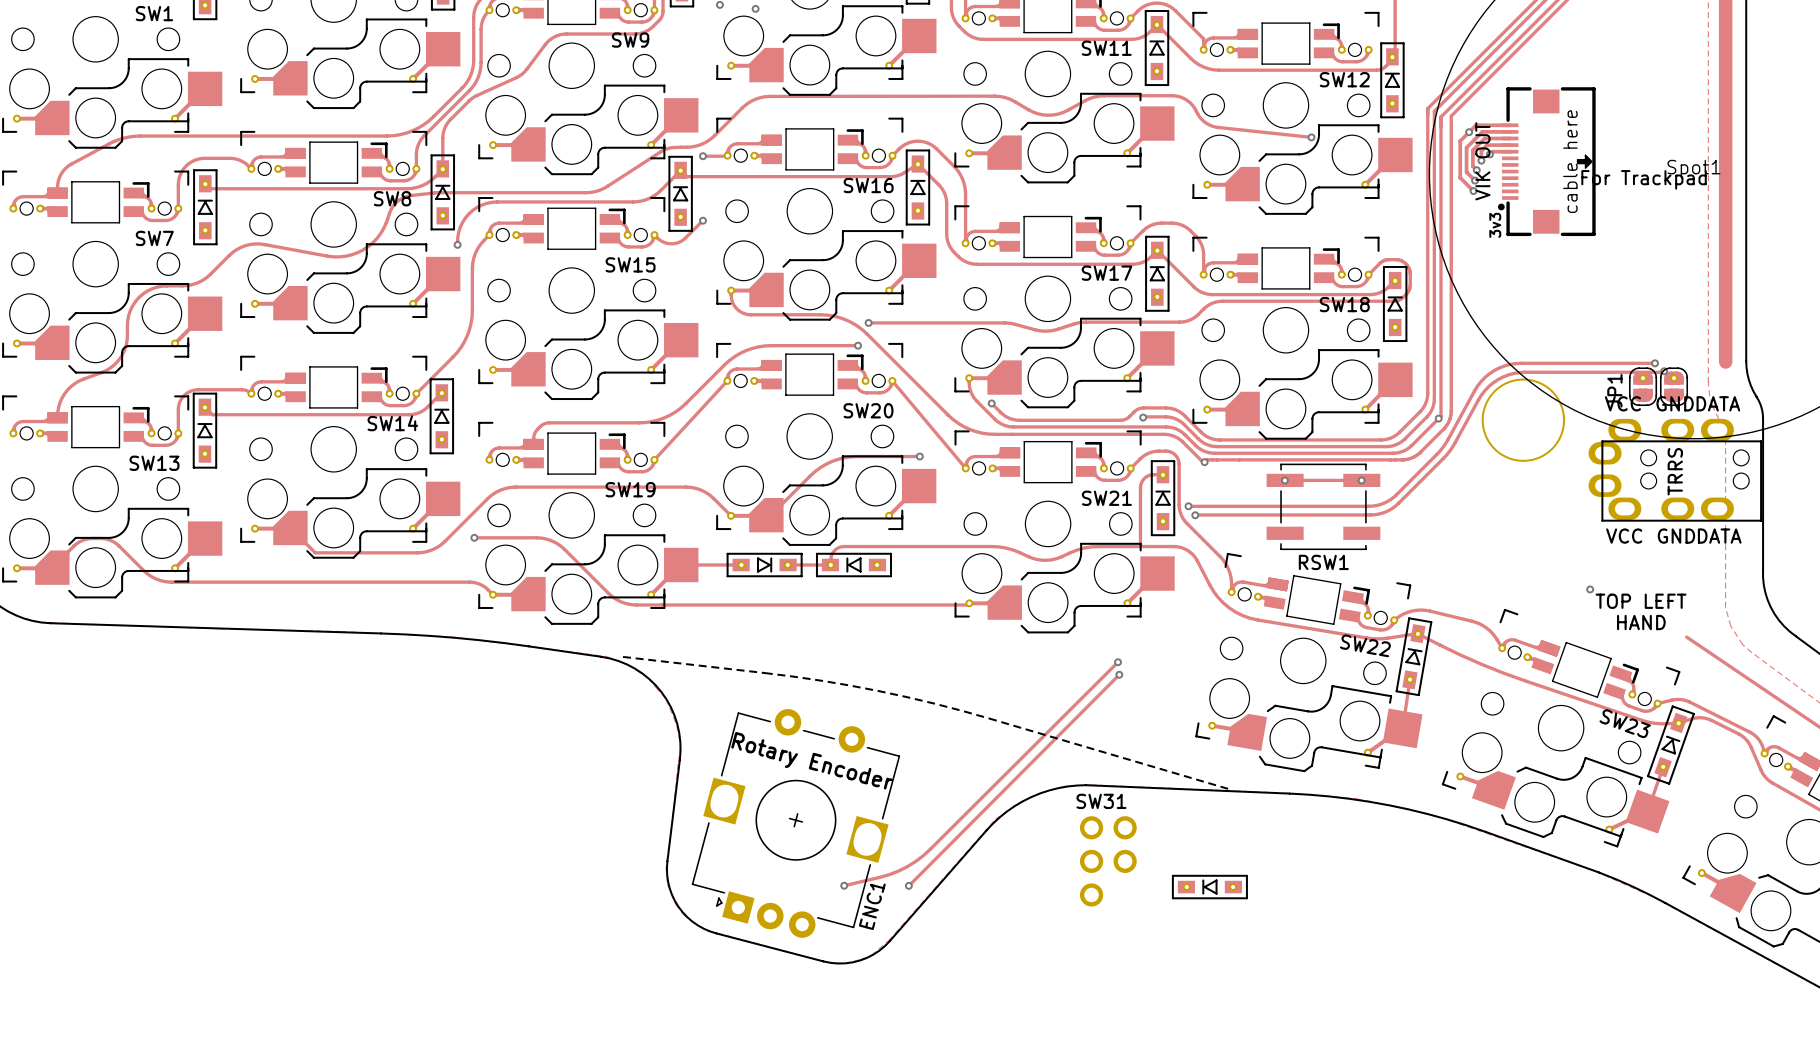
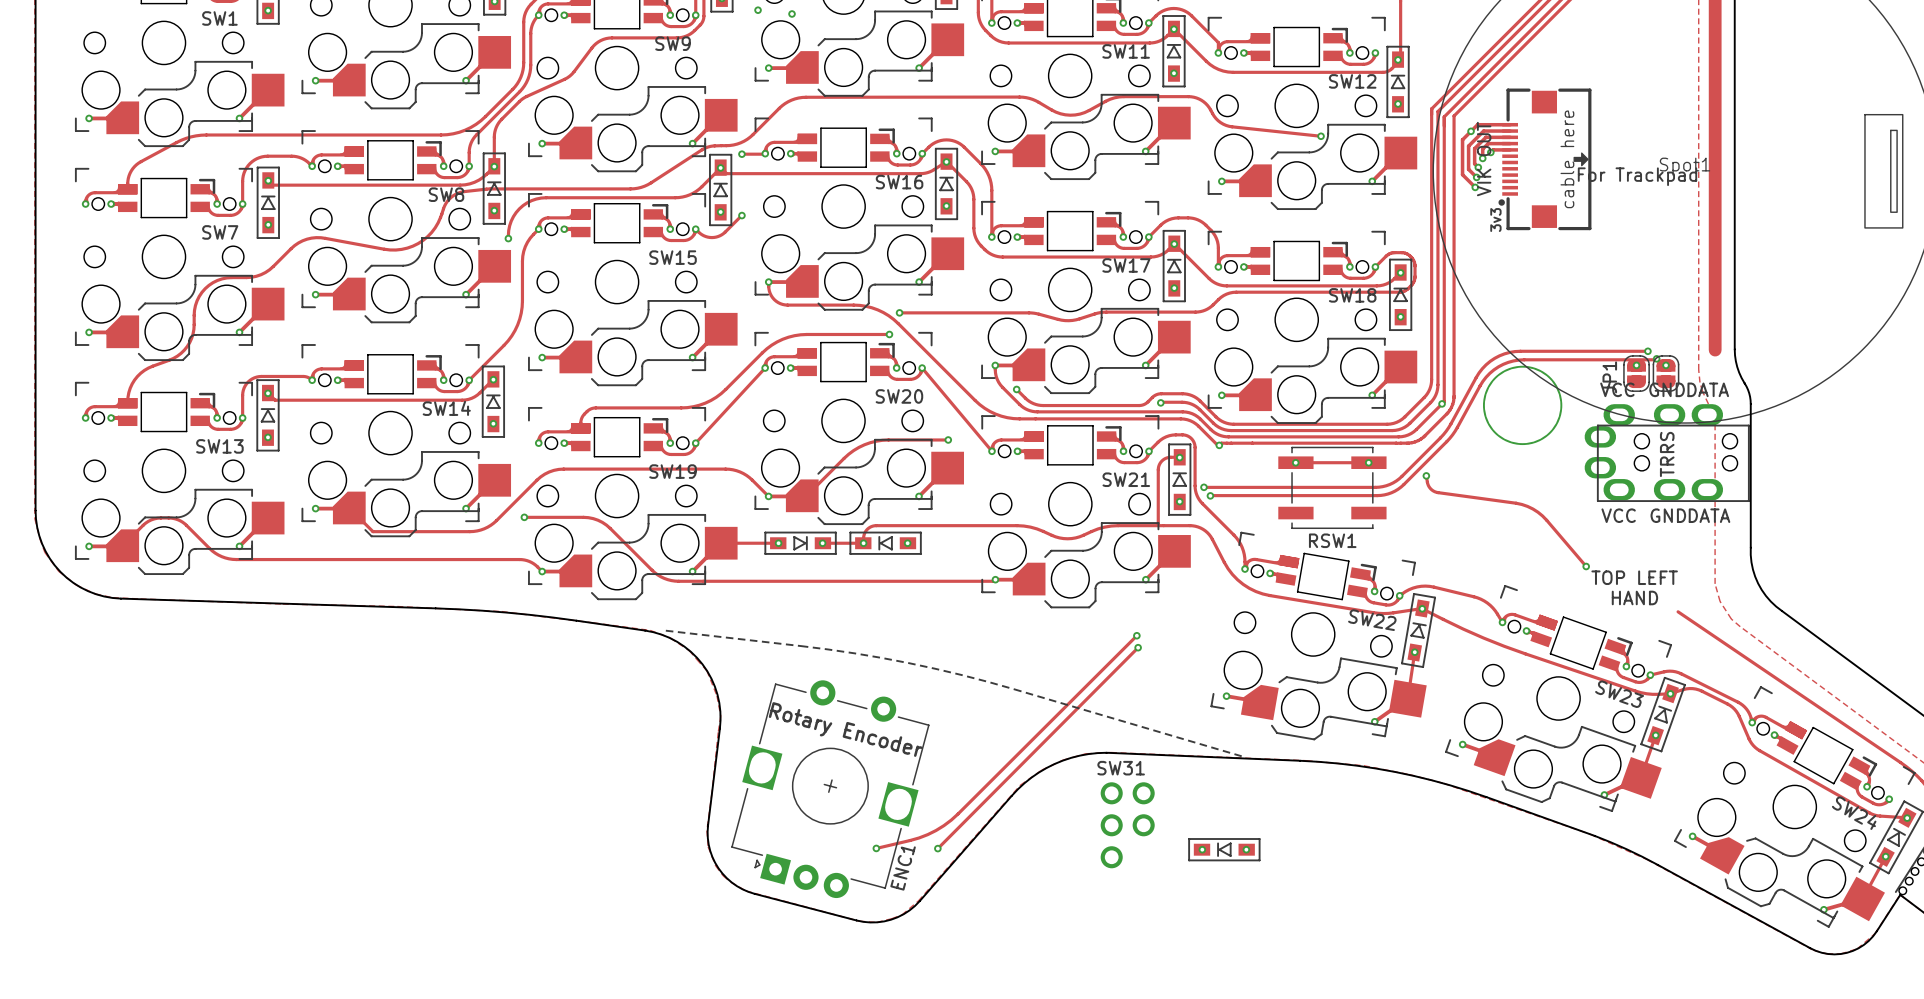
track: none -> (1426, 475) (1429, 486) (1436, 492) (1516, 503) (1532, 509) (1546, 520) (1586, 566)
via: none -> (1426, 475)

